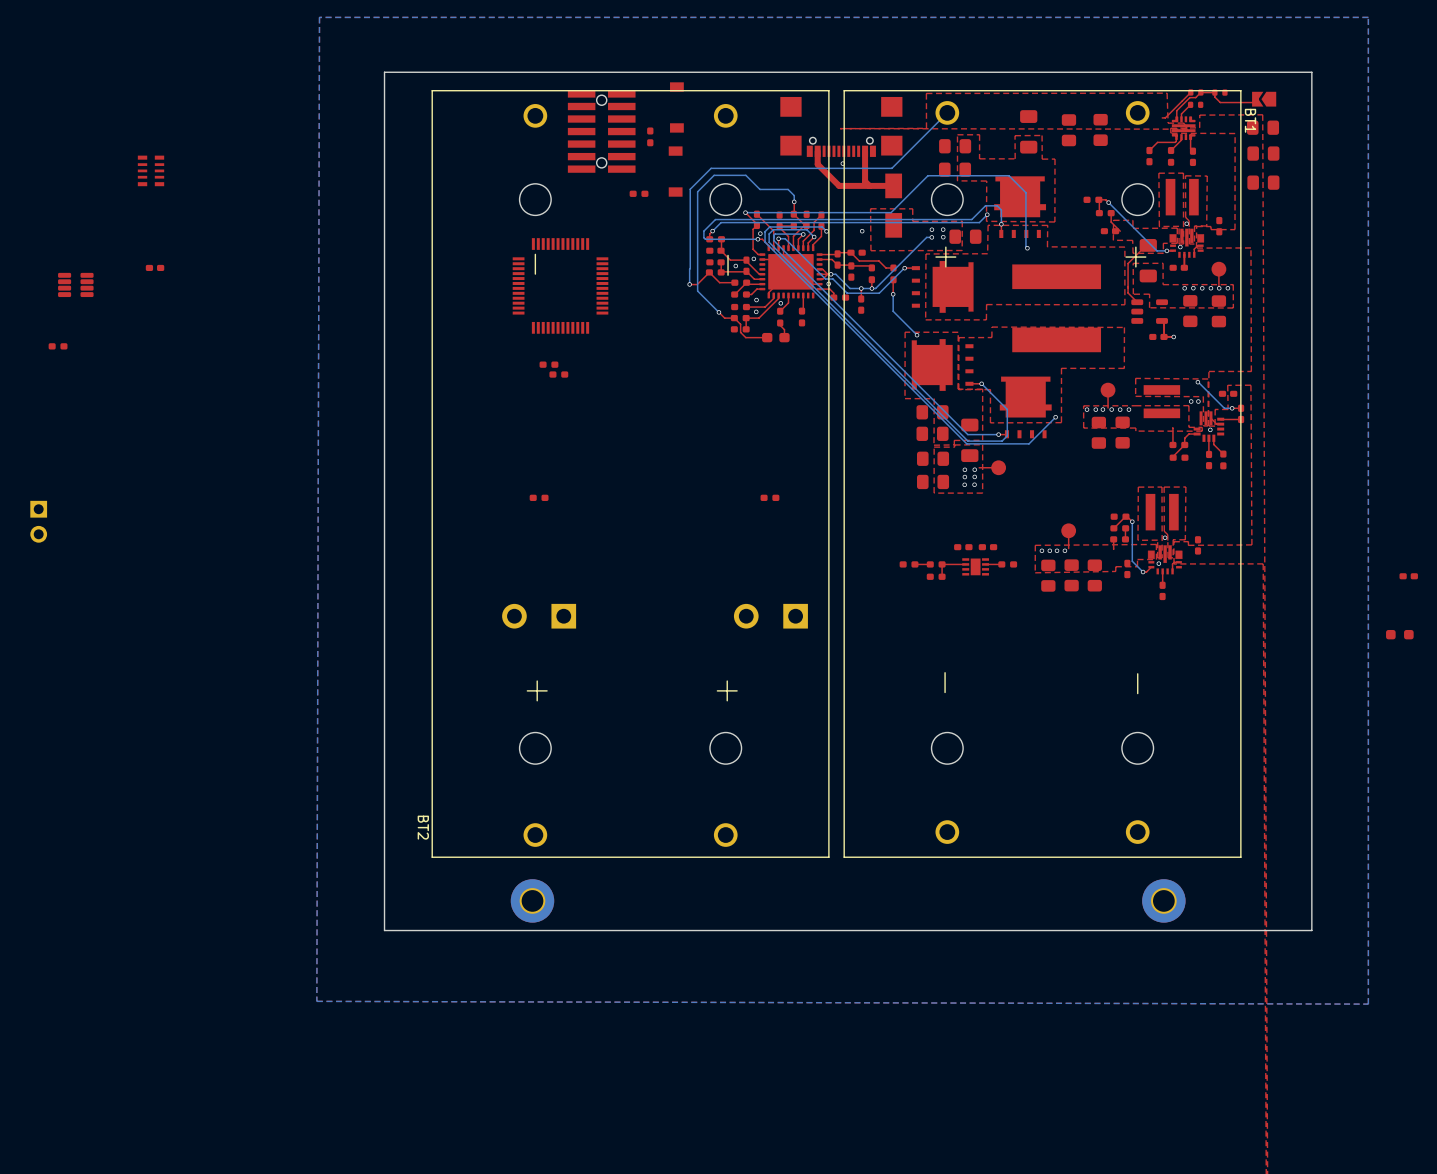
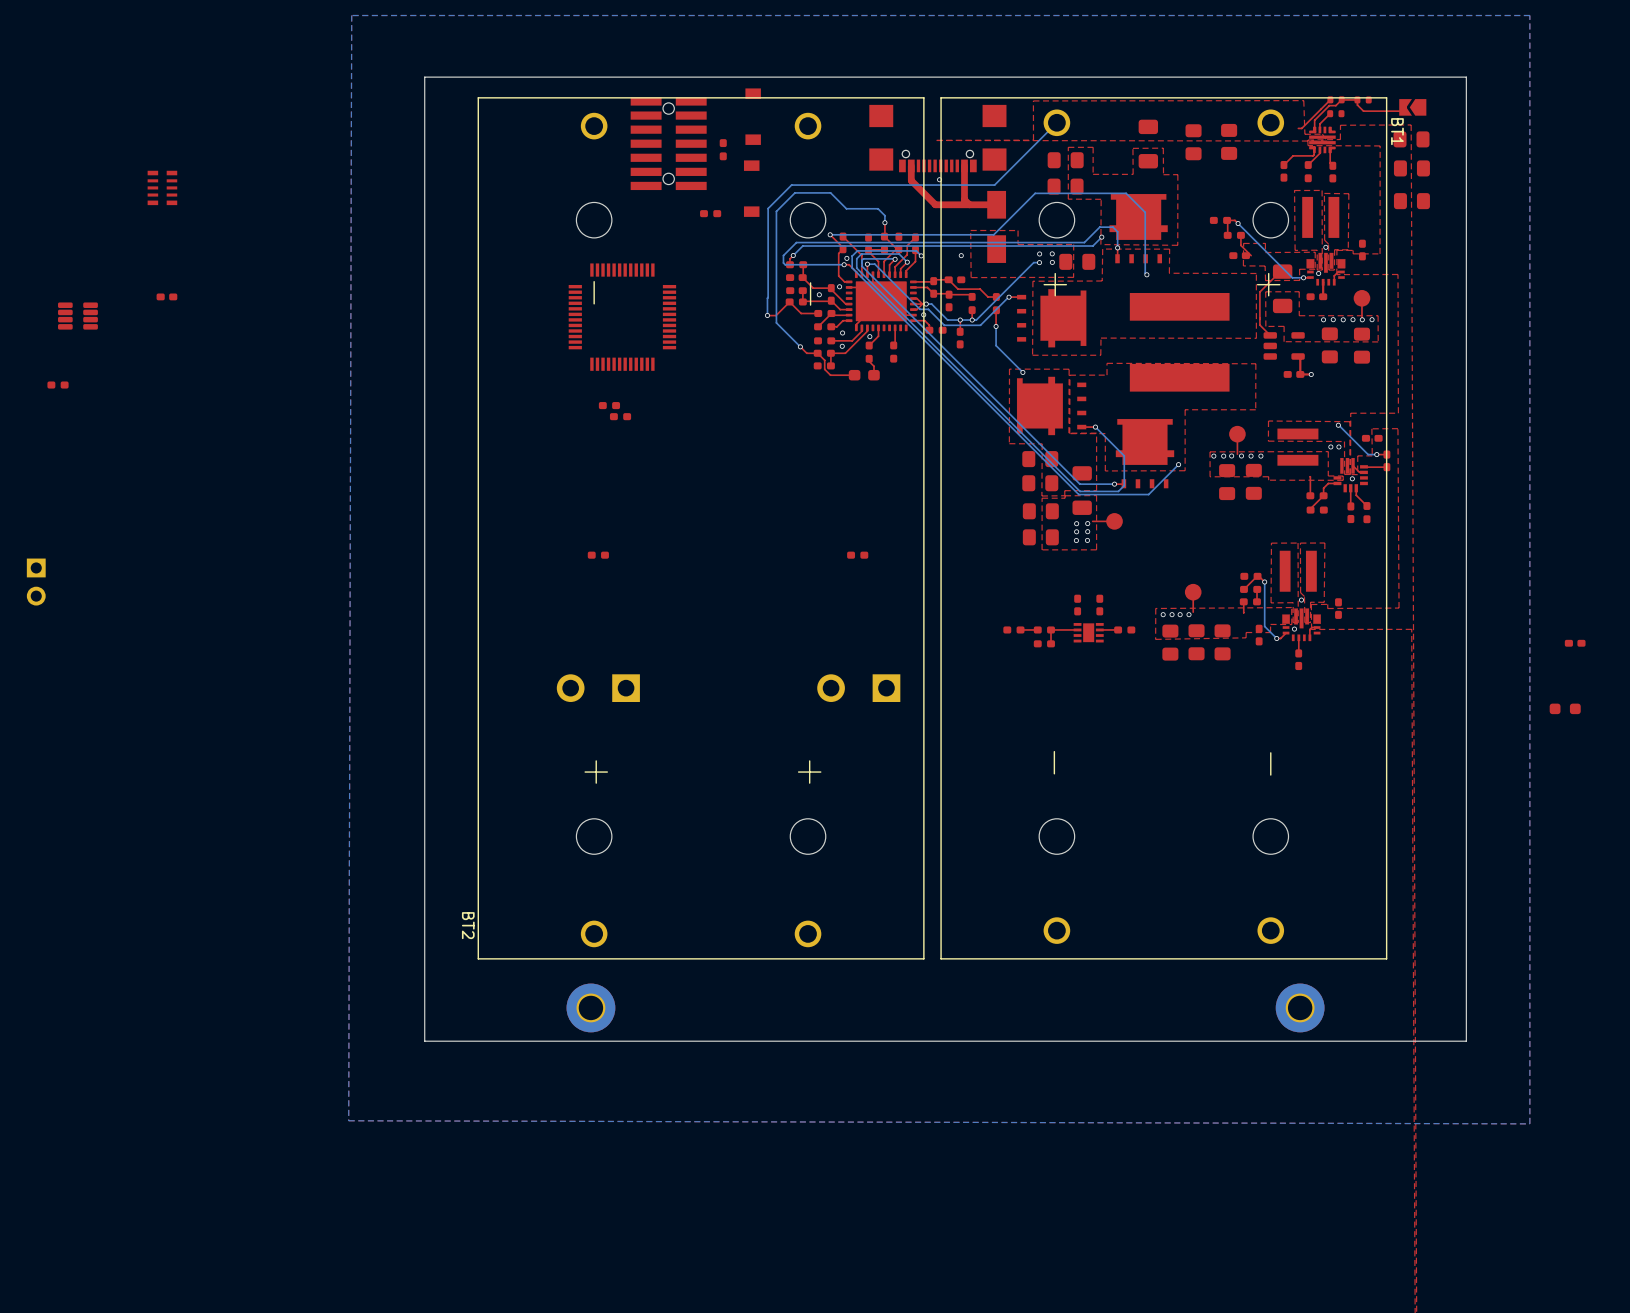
part rotation: 0° (963, 547) -> 90° clockwise (1077, 605)
part rotation: 0° (987, 547) -> 90° clockwise (1099, 605)

